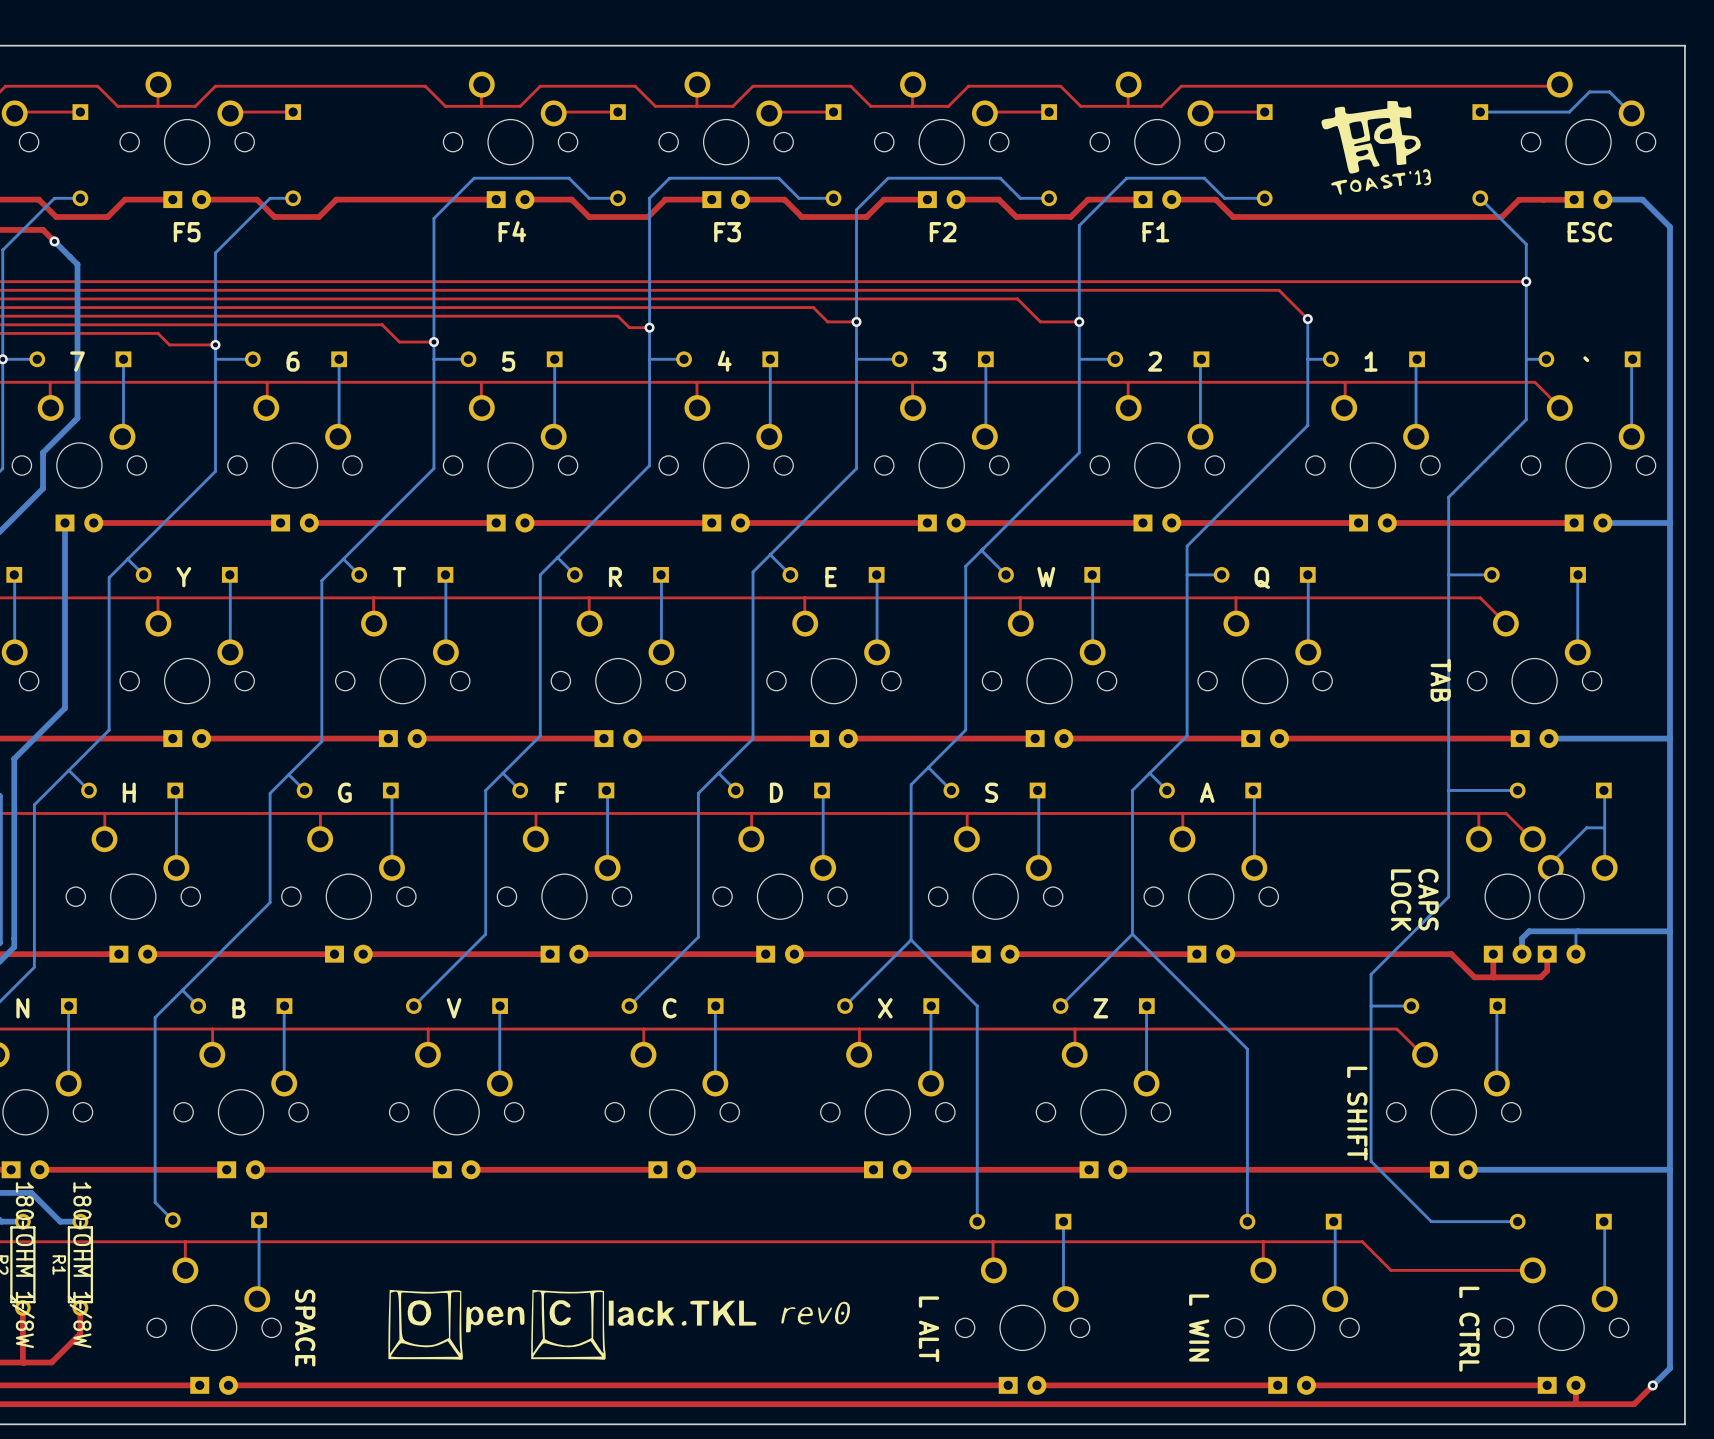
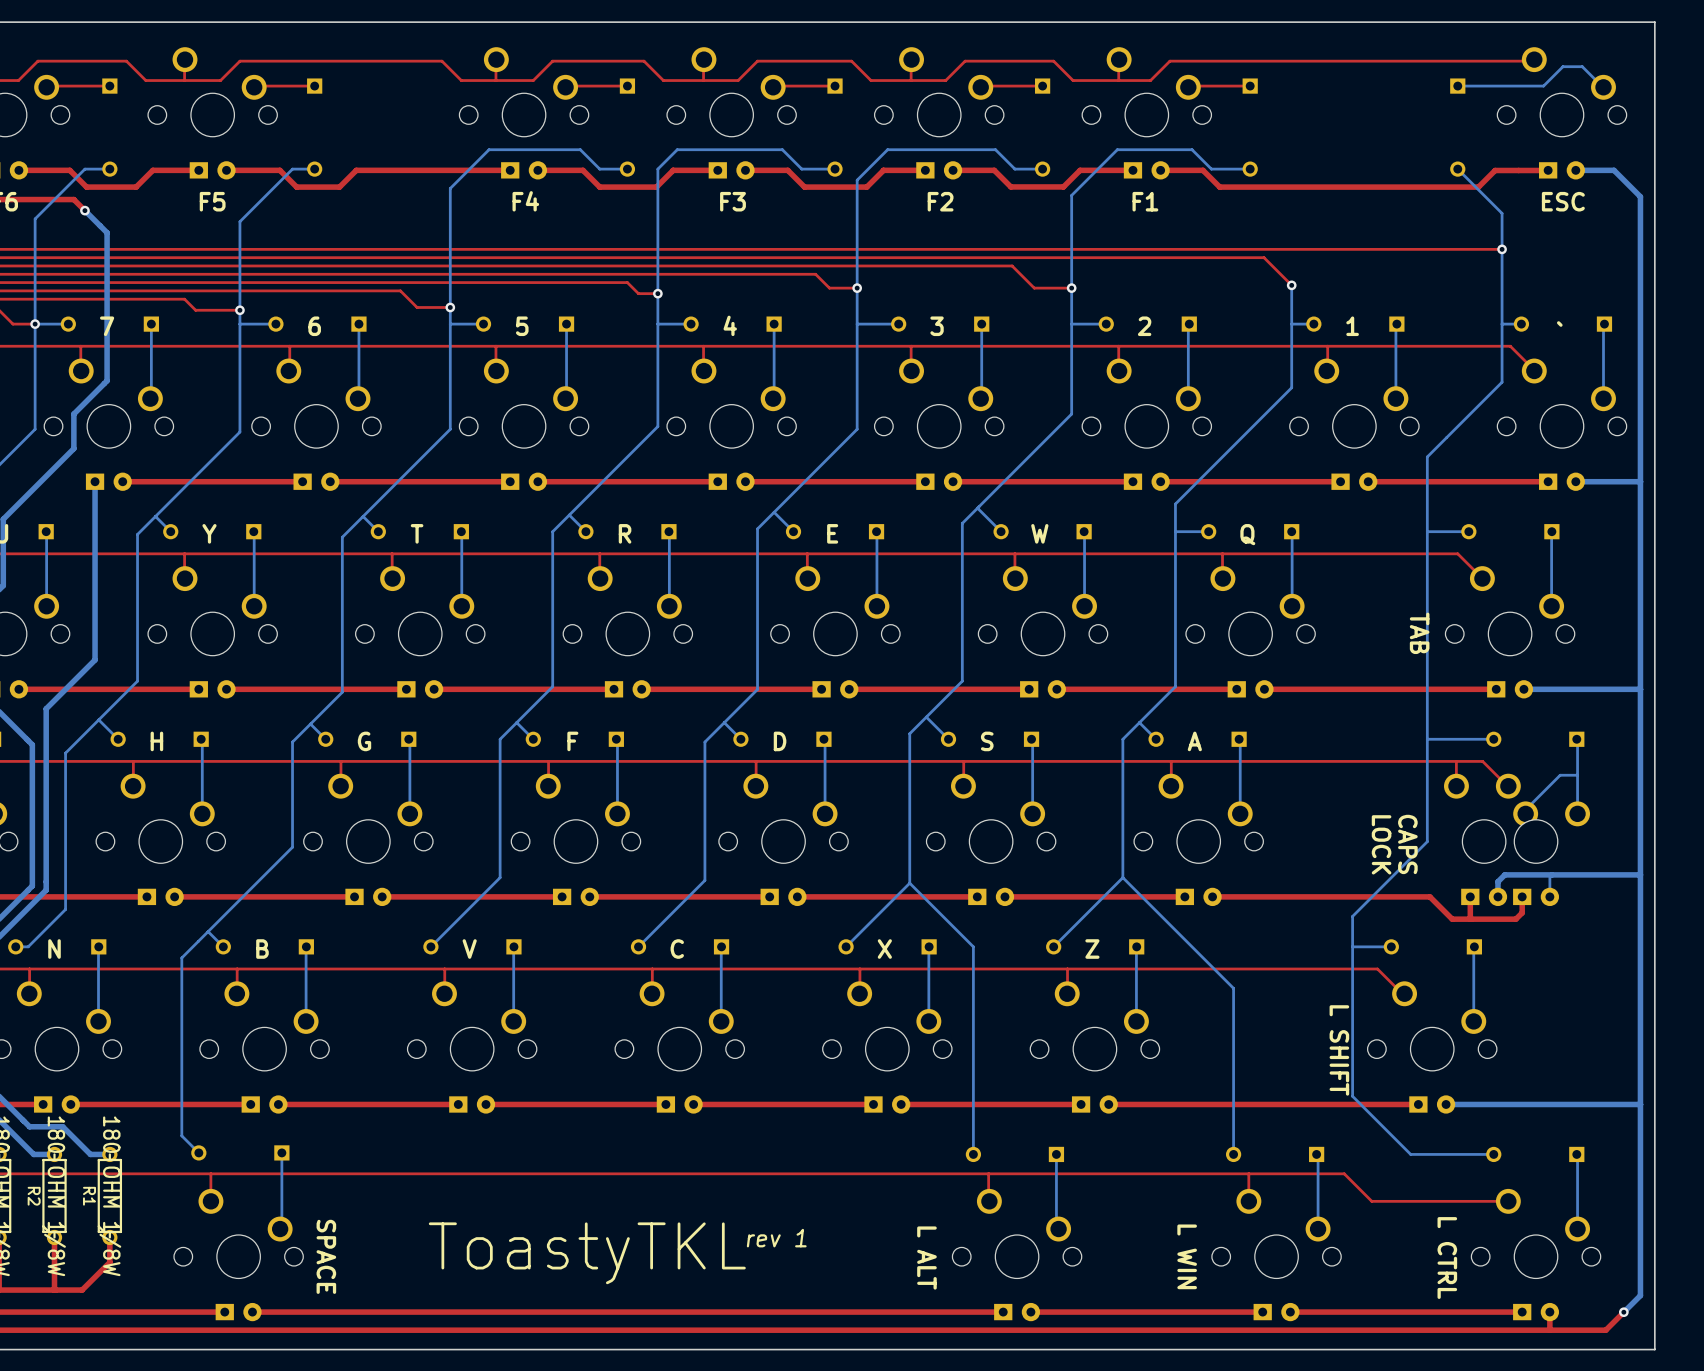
drawing: [1321, 101, 1432, 195] -> none
drawing: [388, 1289, 851, 1360] -> none
text: none -> rev 1 (776, 1238)
text: none -> ToastyTKL (587, 1253)

